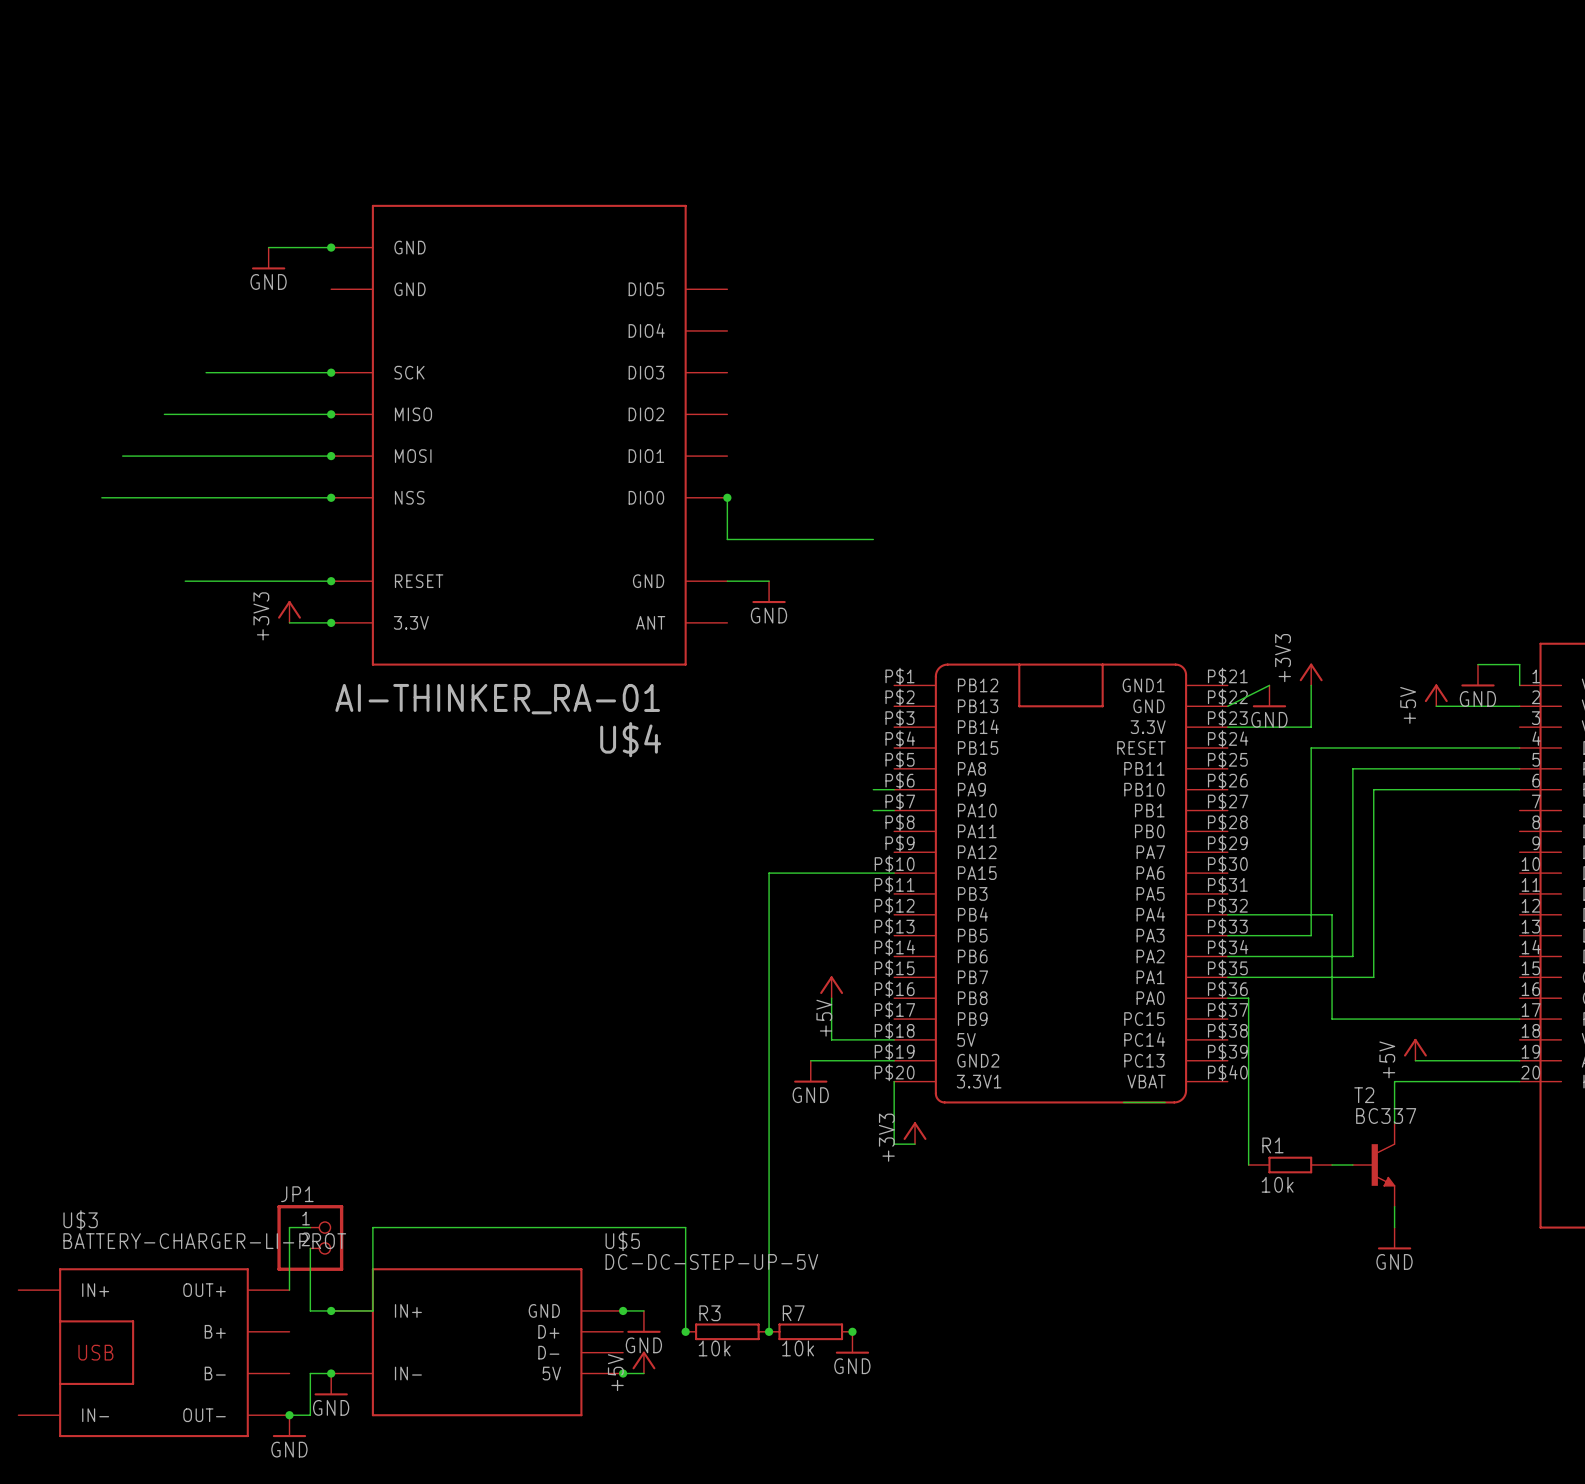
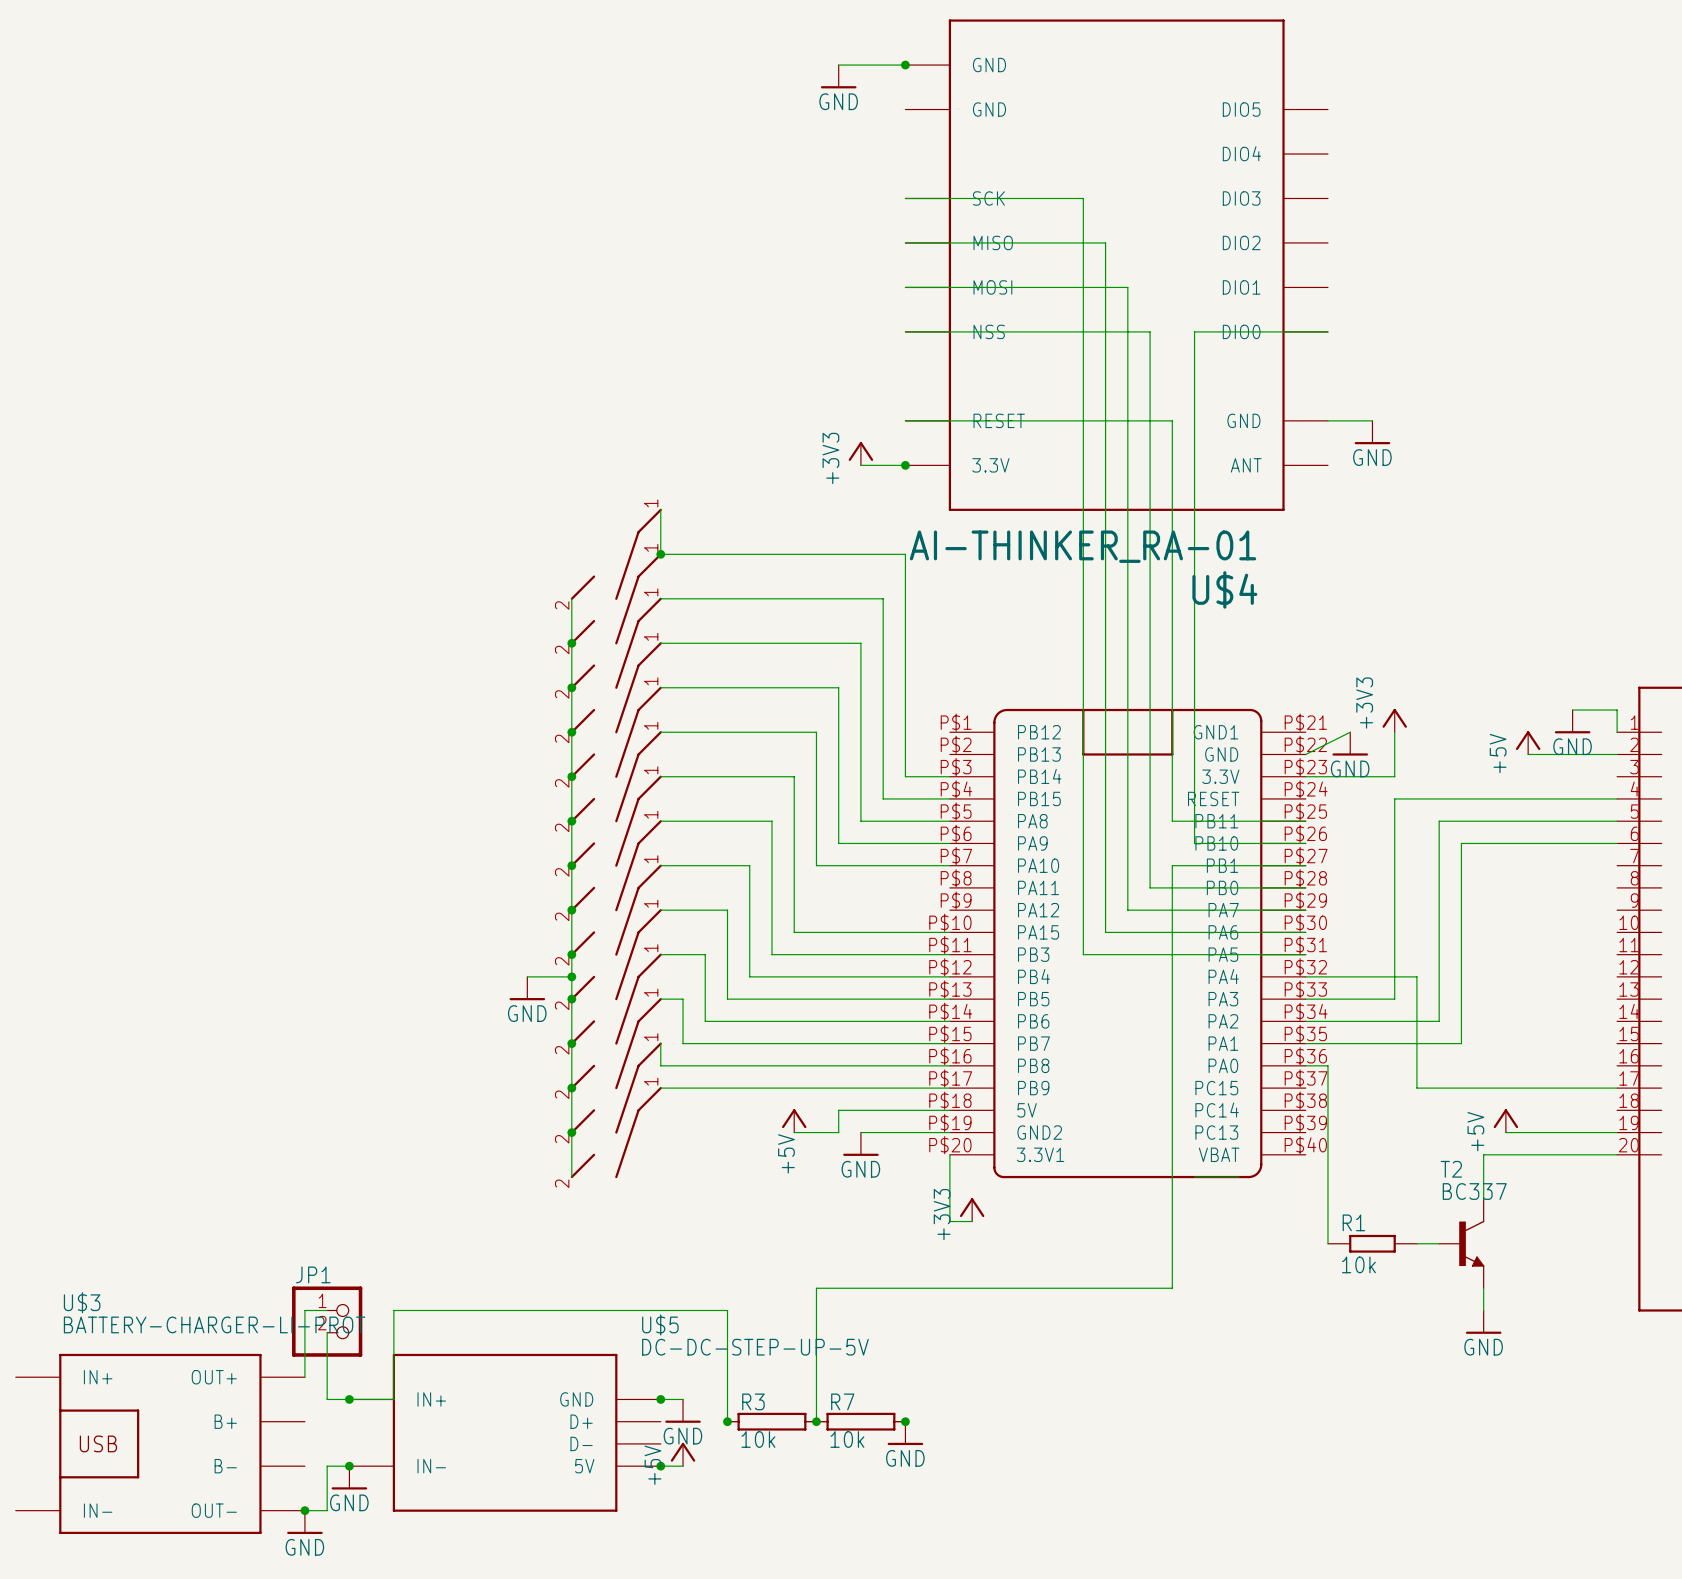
wire: none -> (838, 65) (905, 65)
junction: none -> (905, 65)
power symbol: none -> GND (838, 76)
wire: none -> (905, 198) (1083, 198) (1083, 954) (1305, 954)
wire: none -> (905, 242) (1105, 242) (1105, 932) (1305, 932)
wire: (268, 247) (331, 247) -> none
junction: (331, 247) -> none
power symbol: GND (268, 258) -> none
wire: none -> (905, 287) (1127, 287) (1127, 910) (1305, 910)
wire: none -> (905, 331) (1150, 331) (1150, 887) (1305, 887)
wire: none -> (1327, 331) (1194, 331) (1194, 843) (1305, 843)
wire: (206, 372) (331, 372) -> none
junction: (331, 372) -> none
wire: none -> (905, 420) (1172, 420) (1172, 821) (1305, 821)
wire: none -> (1327, 420) (1372, 420)
power symbol: none -> GND (1372, 432)
wire: (164, 414) (331, 414) -> none
junction: (331, 414) -> none
power symbol: none -> +3V3 (860, 453)
U$4 position: (529, 435) -> (1116, 265)
junction: none -> (905, 465)
wire: (122, 456) (331, 456) -> none
junction: (331, 456) -> none
wire: none -> (660, 509) (660, 554) (905, 554) (905, 776) (949, 776)
wire: (101, 497) (331, 497) -> none
junction: (331, 497) -> none
wire: (727, 497) (727, 539) (873, 539) -> none
junction: (727, 497) -> none
part: none -> (616, 554)
junction: none -> (660, 554)
wire: none -> (571, 598) (571, 1177)
part: none -> (616, 598)
wire: none -> (660, 598) (883, 598) (883, 798) (949, 798)
wire: (185, 581) (331, 581) -> none
junction: (331, 581) -> none
wire: (727, 581) (769, 581) -> (860, 465) (905, 465)
power symbol: GND (769, 592) -> none
junction: none -> (571, 643)
part: none -> (616, 643)
wire: none -> (660, 643) (860, 643) (860, 821) (949, 821)
power symbol: +3V3 (289, 611) -> none
wire: (289, 622) (331, 622) -> none
junction: (331, 622) -> none
junction: none -> (571, 687)
part: none -> (616, 687)
wire: none -> (660, 687) (838, 687) (838, 843) (927, 843)
junction: none -> (571, 732)
part: none -> (616, 732)
wire: none -> (660, 732) (816, 732) (816, 865) (927, 865)
junction: none -> (571, 776)
part: none -> (616, 776)
wire: none -> (660, 776) (794, 776) (794, 932) (816, 932)
junction: none -> (571, 821)
part: none -> (616, 821)
wire: none -> (660, 821) (771, 821) (771, 954) (949, 954)
junction: none -> (571, 865)
part: none -> (616, 865)
wire: none -> (660, 865) (749, 865) (749, 976) (949, 976)
junction: none -> (571, 910)
part: none -> (616, 910)
wire: none -> (660, 910) (727, 910) (727, 999) (949, 999)
wire: (769, 873) (769, 1206) -> (1305, 865) (1172, 865) (1172, 1288) (816, 1288)
junction: none -> (571, 954)
part: none -> (616, 954)
wire: none -> (660, 954) (705, 954) (705, 1021) (949, 1021)
wire: none -> (527, 976) (571, 976)
junction: none -> (571, 976)
power symbol: none -> GND (527, 988)
junction: none -> (571, 999)
part: none -> (616, 999)
wire: none -> (660, 999) (683, 999) (683, 1043) (949, 1043)
junction: none -> (571, 1043)
part: none -> (616, 1043)
wire: none -> (660, 1043) (660, 1065) (949, 1065)
power symbol position: +5V (831, 987) -> +5V (794, 1120)
wire: (831, 998) (831, 1039) -> (794, 1132) (838, 1132) (838, 1110) (883, 1110)
junction: none -> (571, 1088)
part: none -> (616, 1088)
wire: none -> (660, 1088) (949, 1088)
junction: none -> (571, 1132)
part: none -> (616, 1132)

